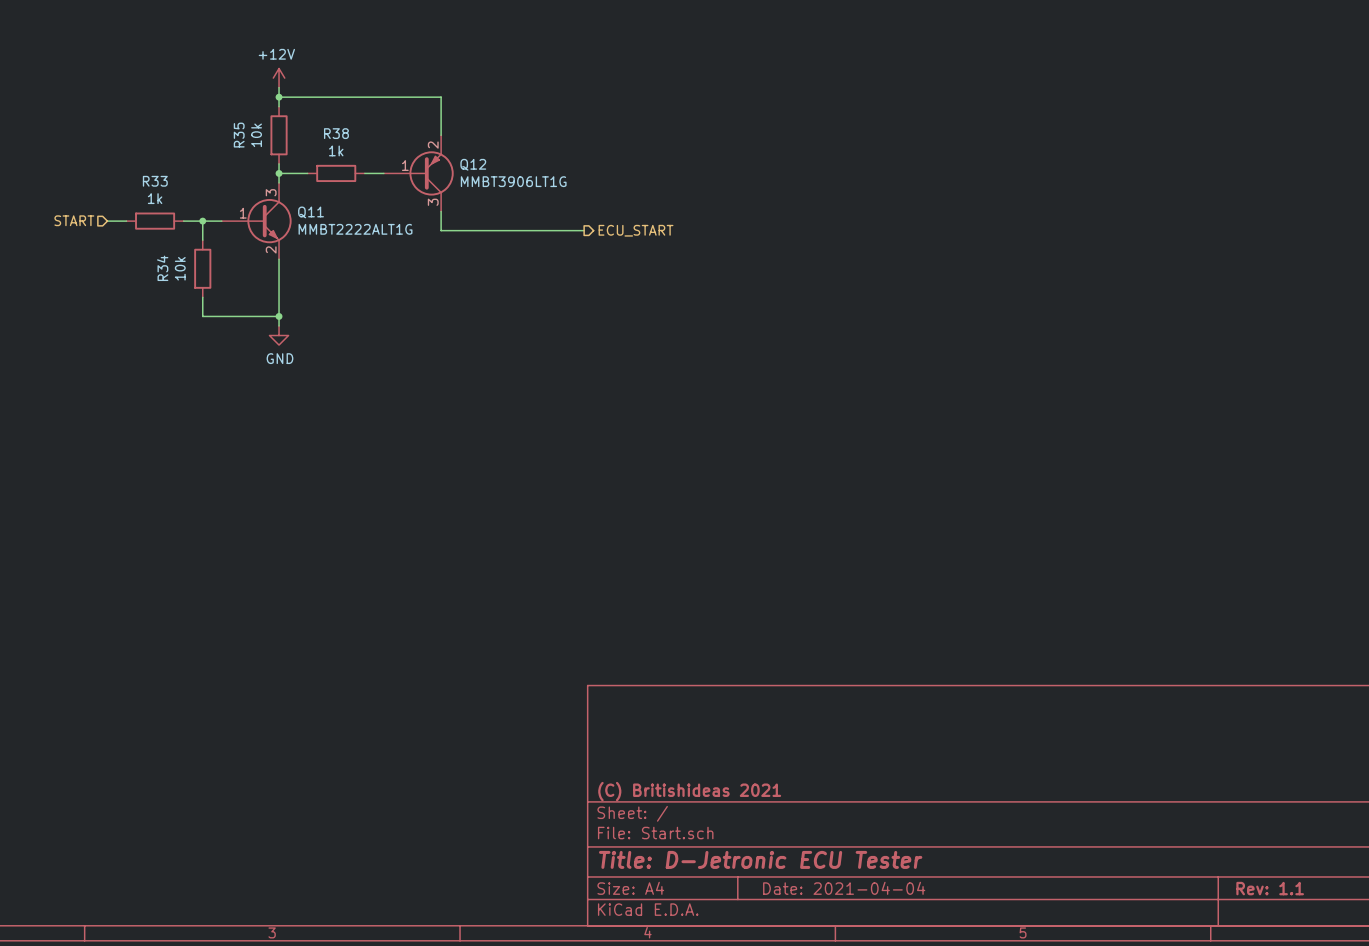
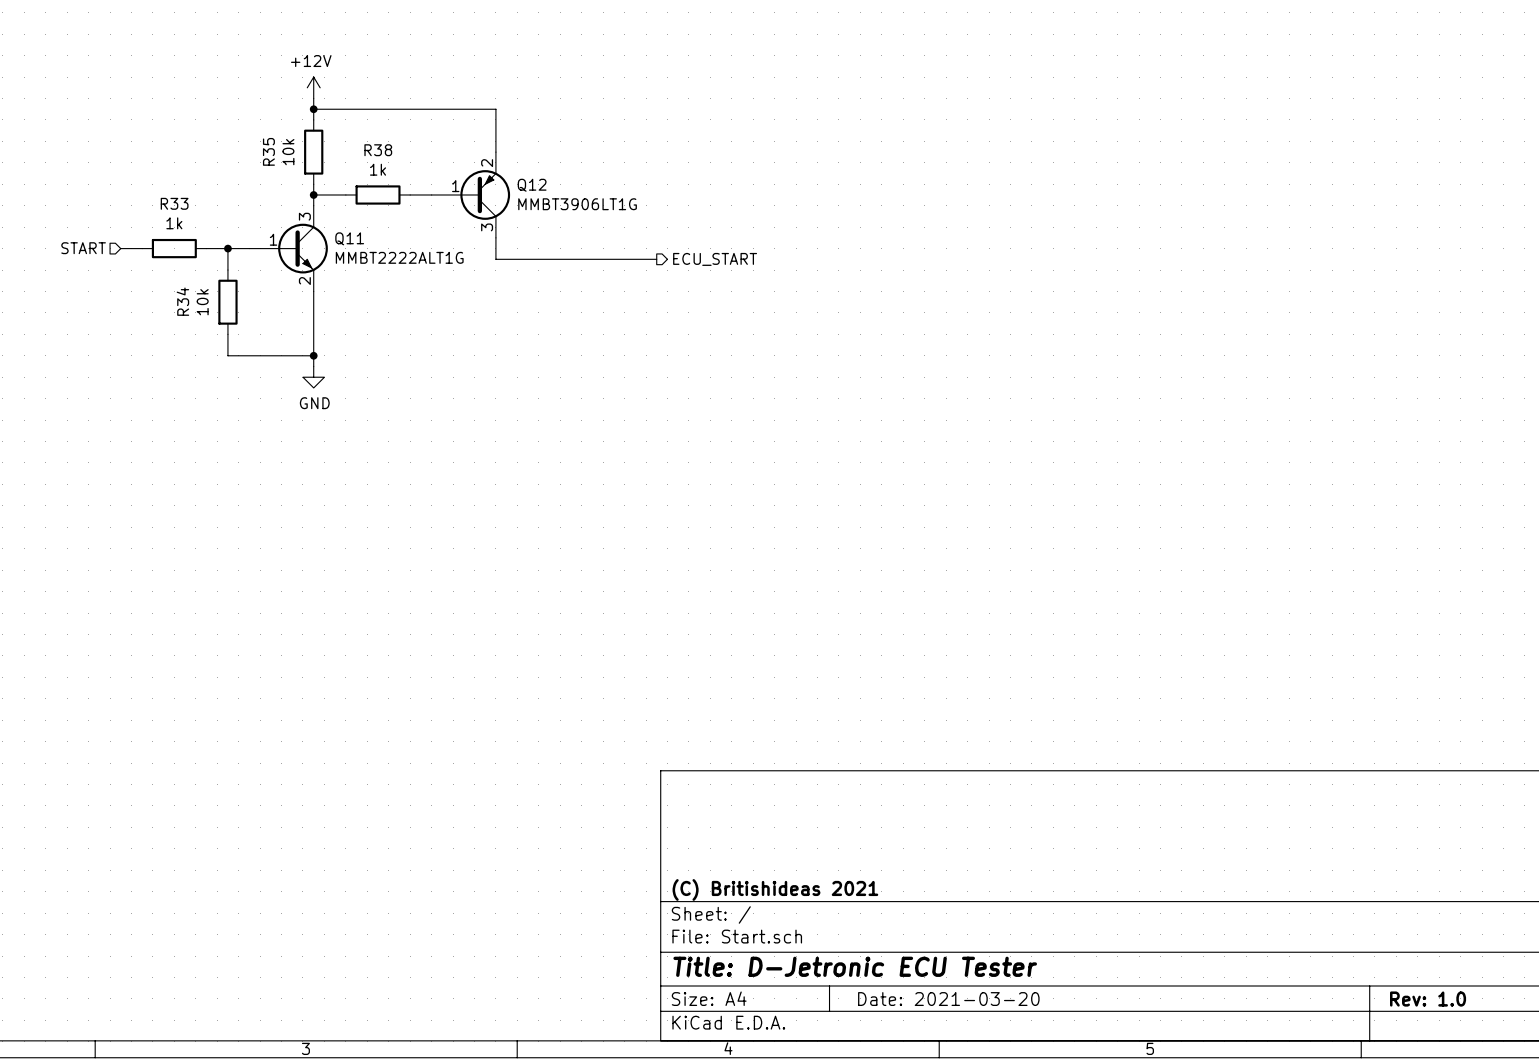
title block: Date: 2021-04-04 (844, 888) -> Date: 2021-03-20 (948, 999)
title block: Rev: 1.1 (1270, 888) -> Rev: 1.0 (1428, 999)

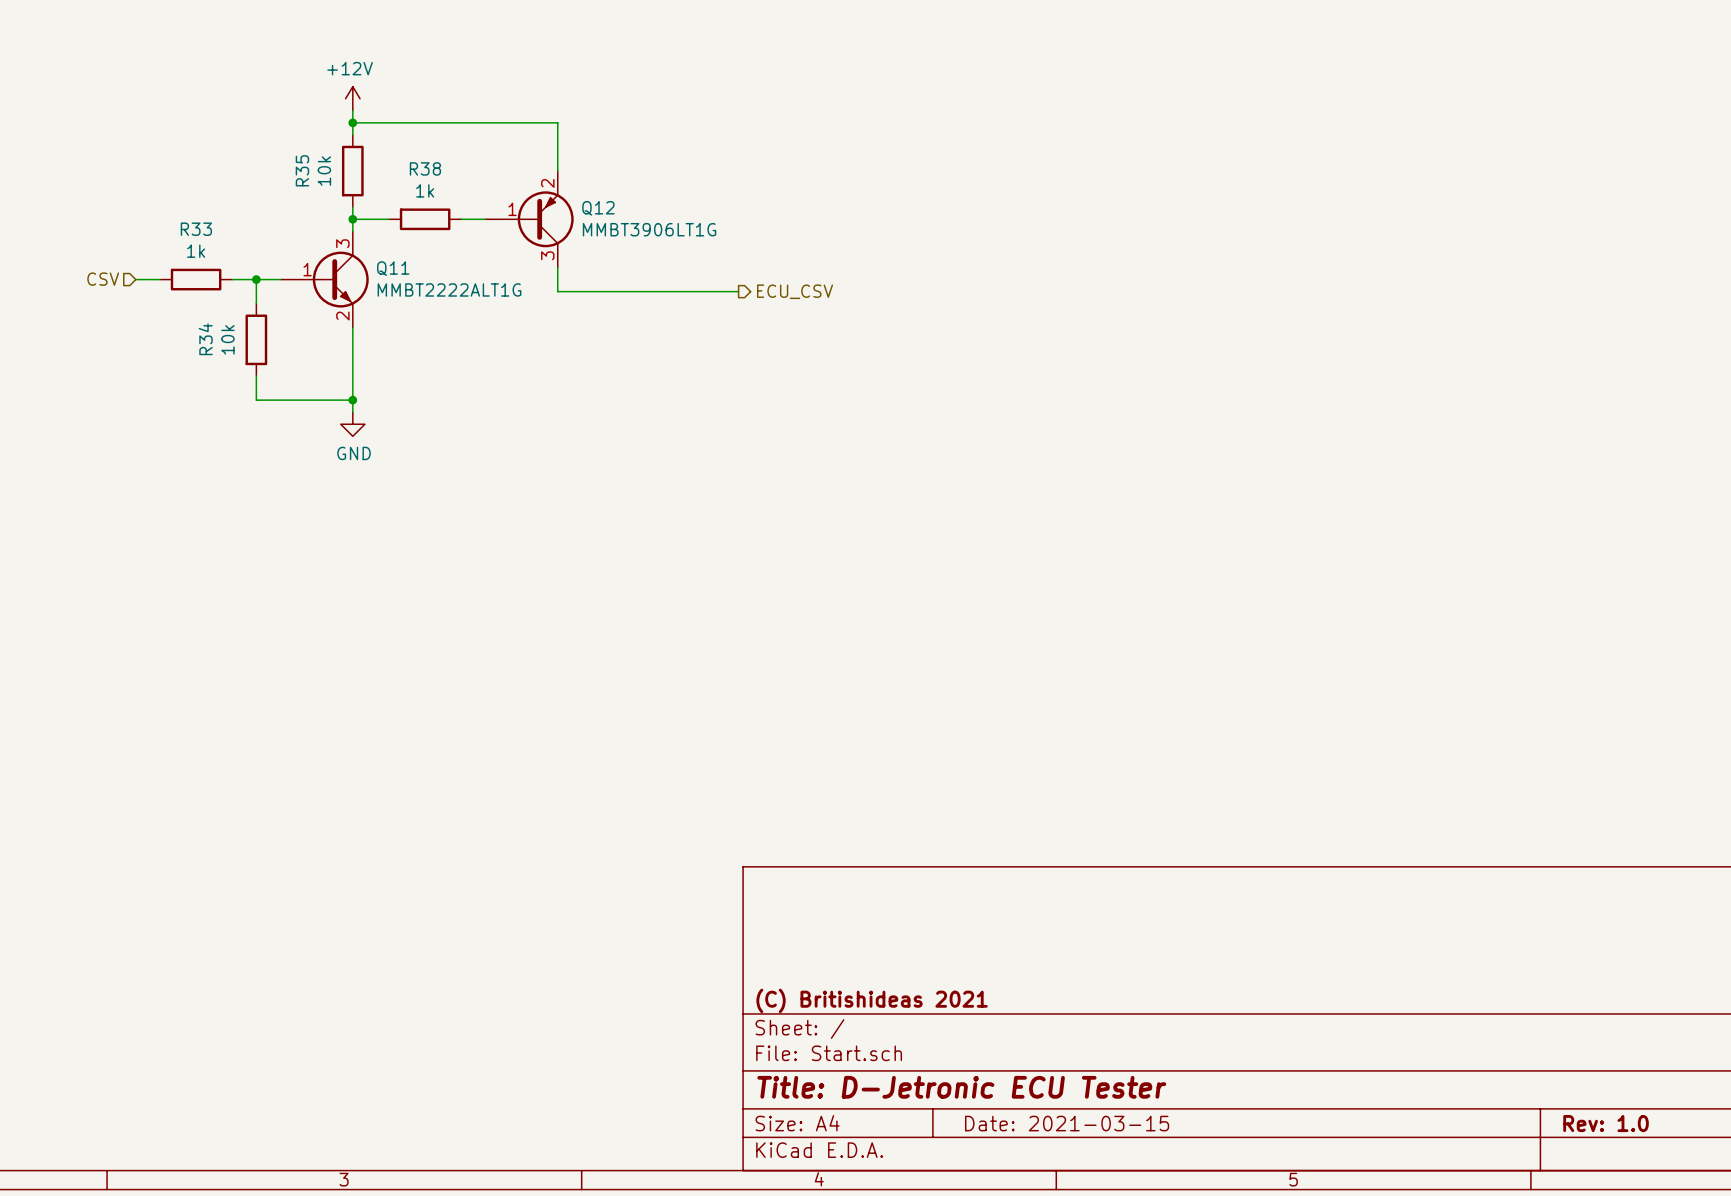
hierarchical label: START (83, 248) -> CSV (103, 279)
hierarchical label: ECU_START (715, 259) -> ECU_CSV (795, 291)
title block: Date: 2021-03-20 (948, 999) -> Date: 2021-03-15 (1067, 1123)

